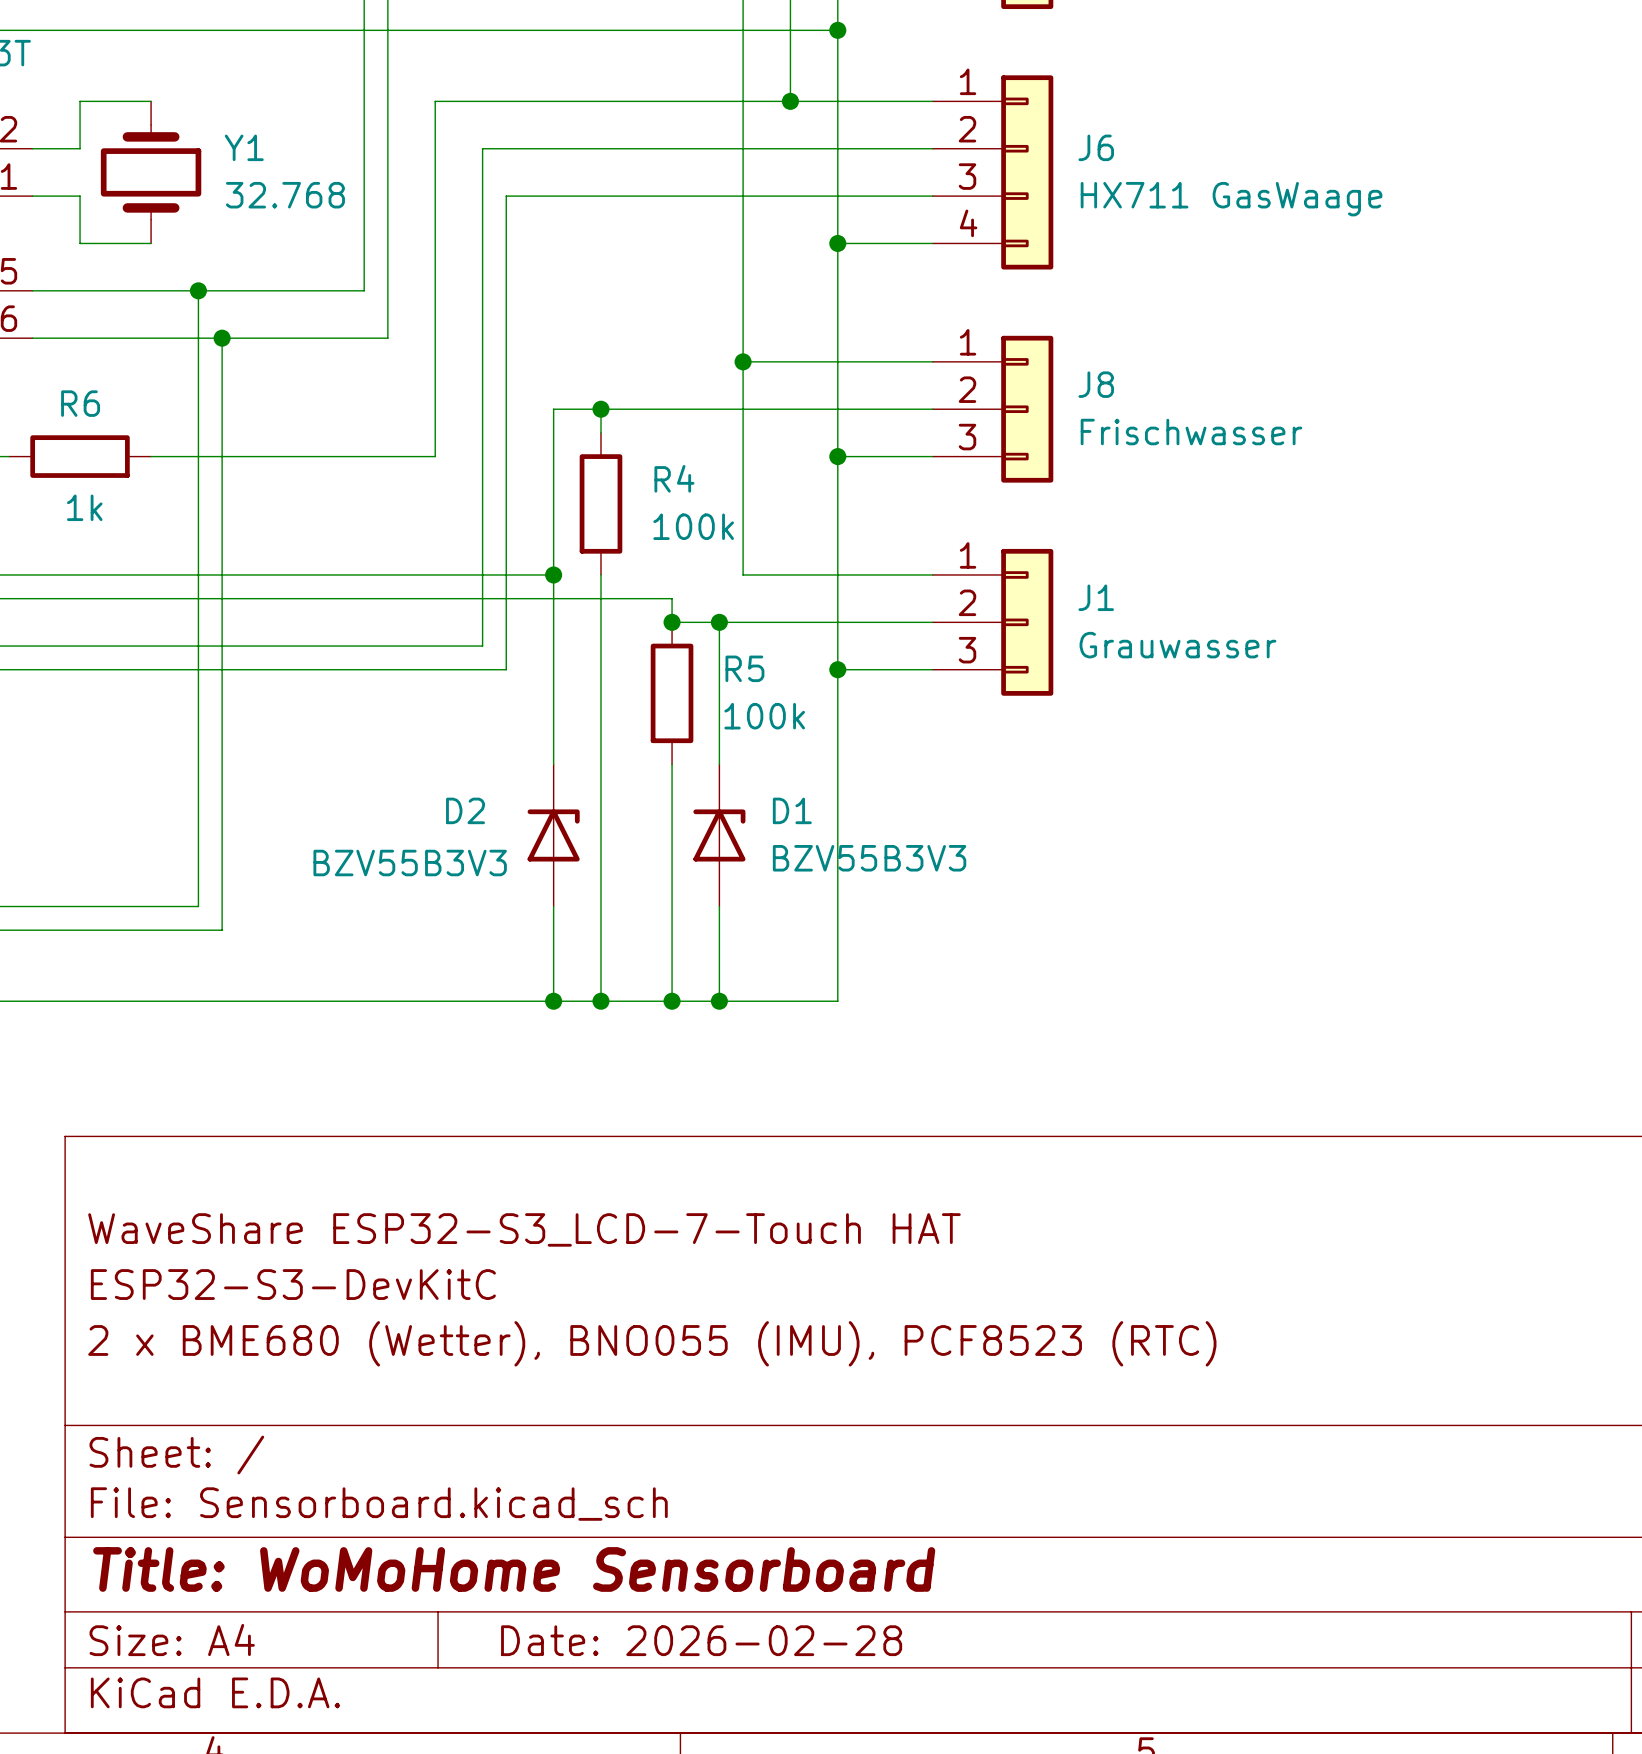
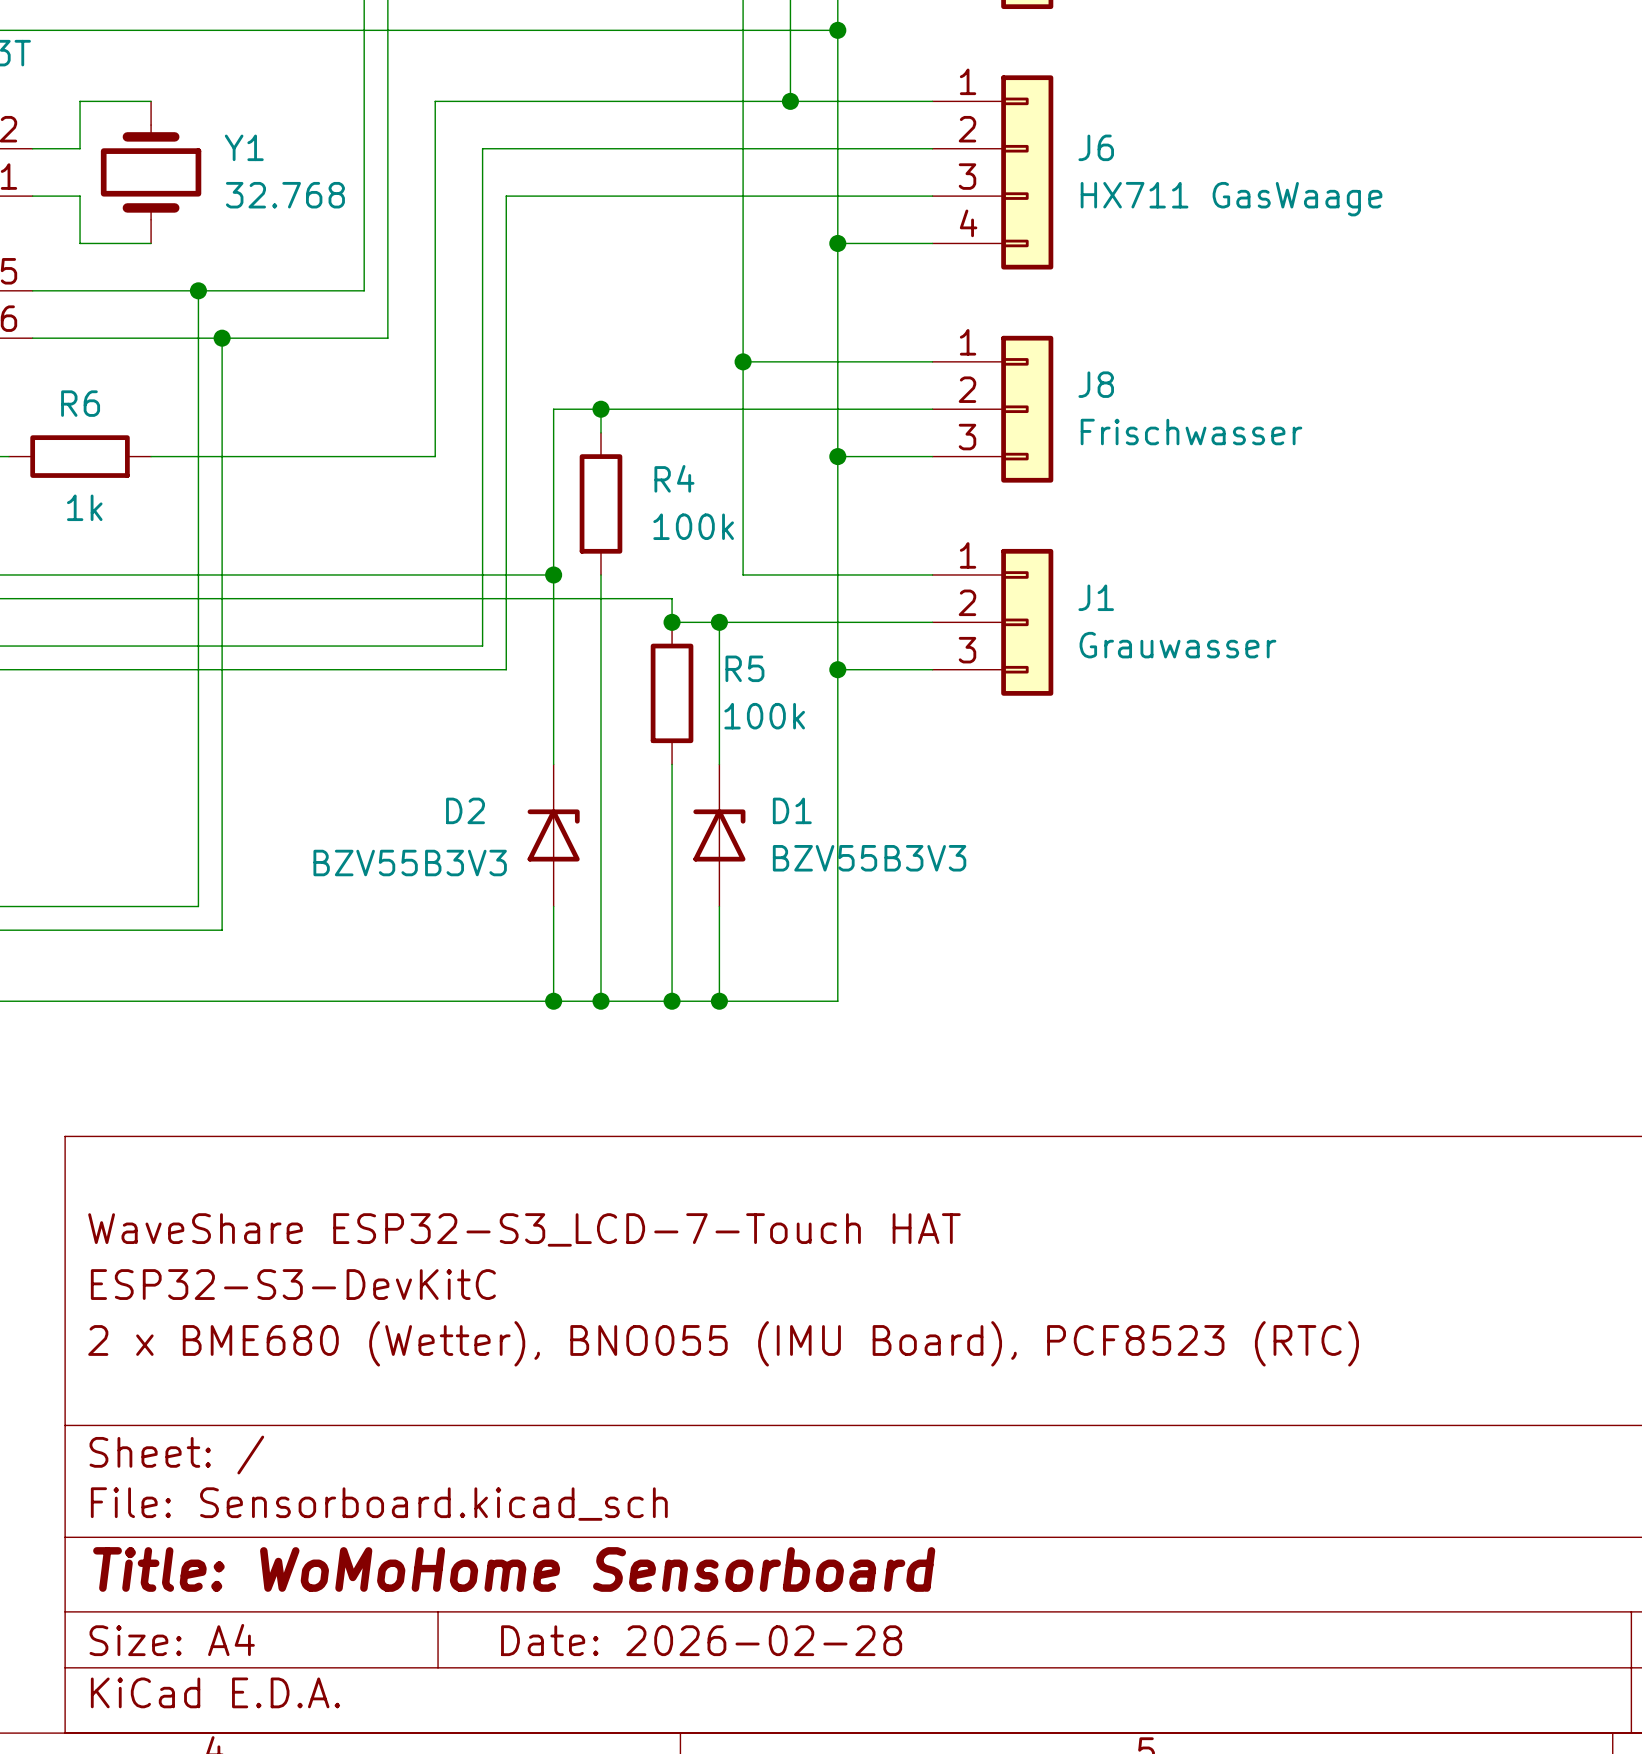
title block: 2 x BME680 (Wetter), BNO055 (IMU), PCF8523 (RTC) (652, 1343) -> 2 x BME680 (Wetter), BNO055 (IMU Board), PCF8523 (RTC) (723, 1343)

